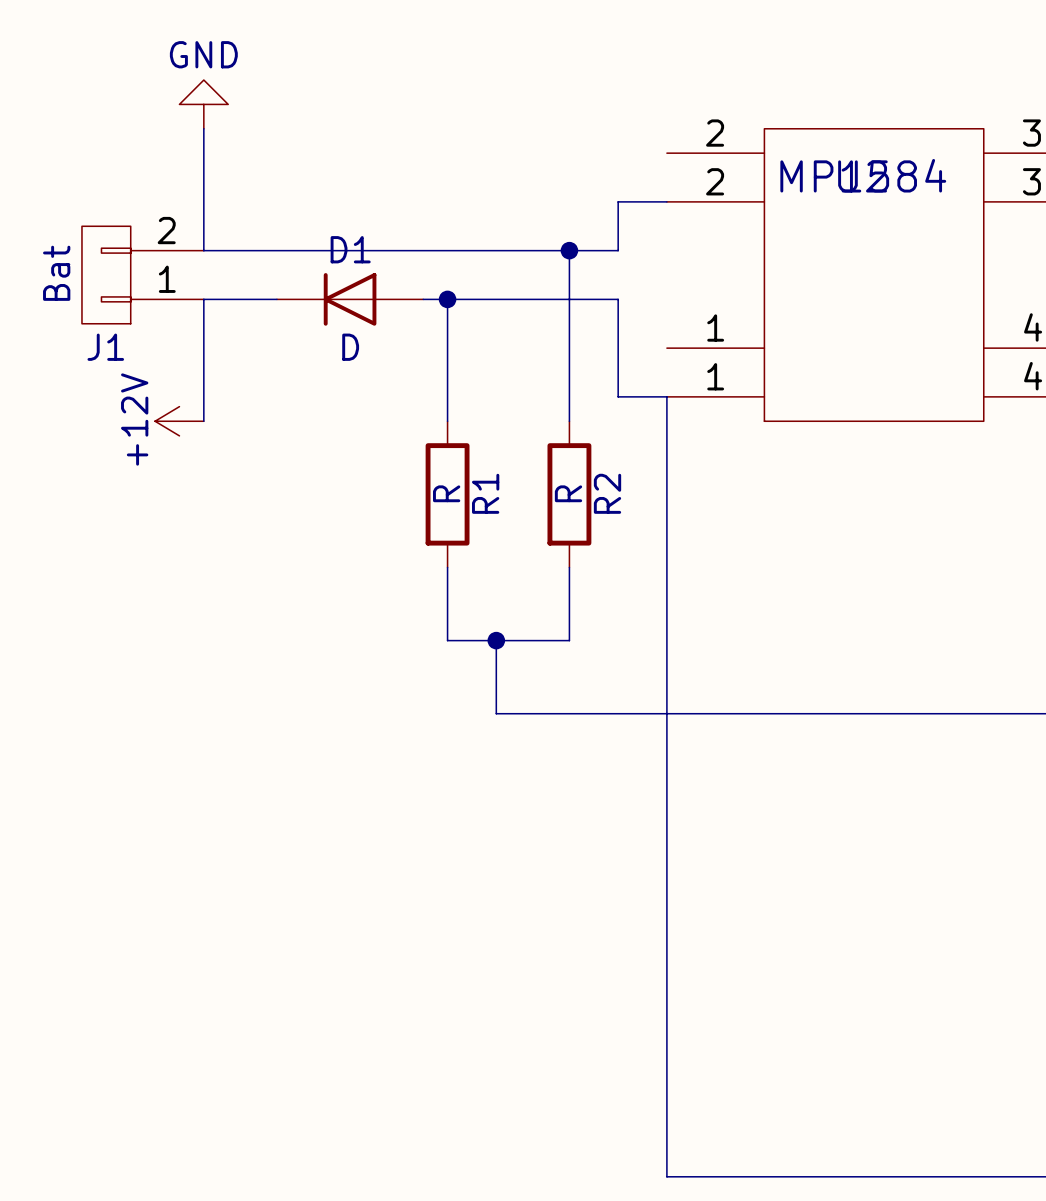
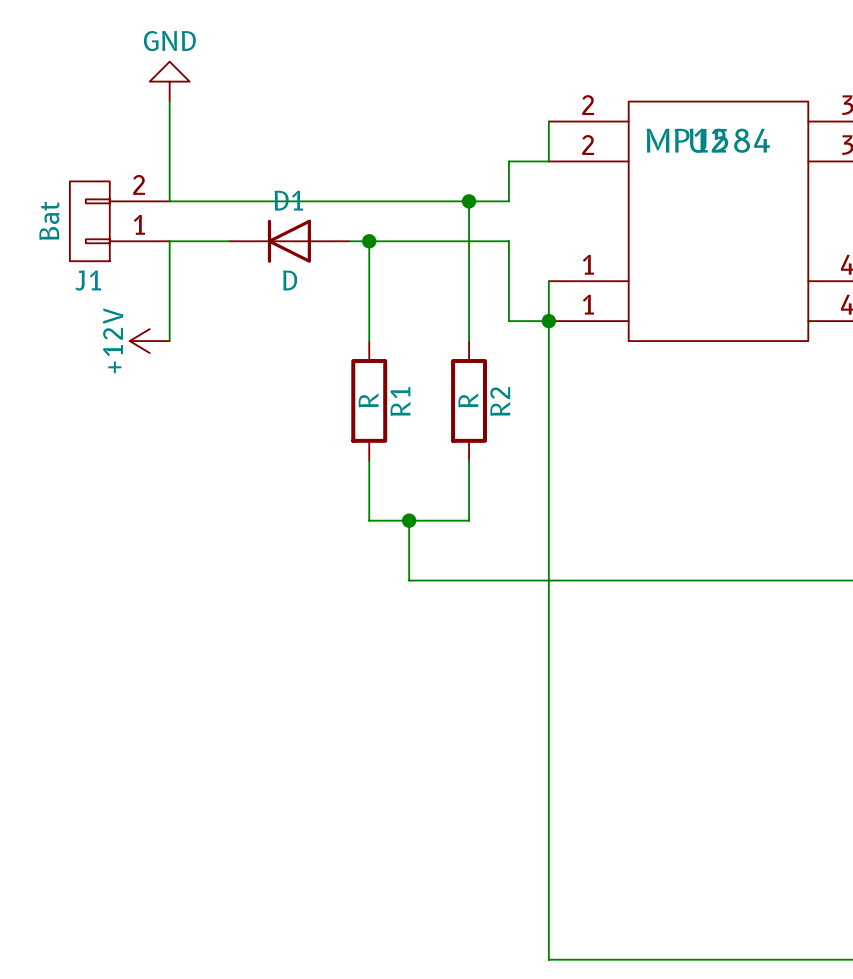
wire: none -> (548, 121) (548, 161)
wire: none -> (548, 281) (548, 321)
junction: none -> (548, 321)

